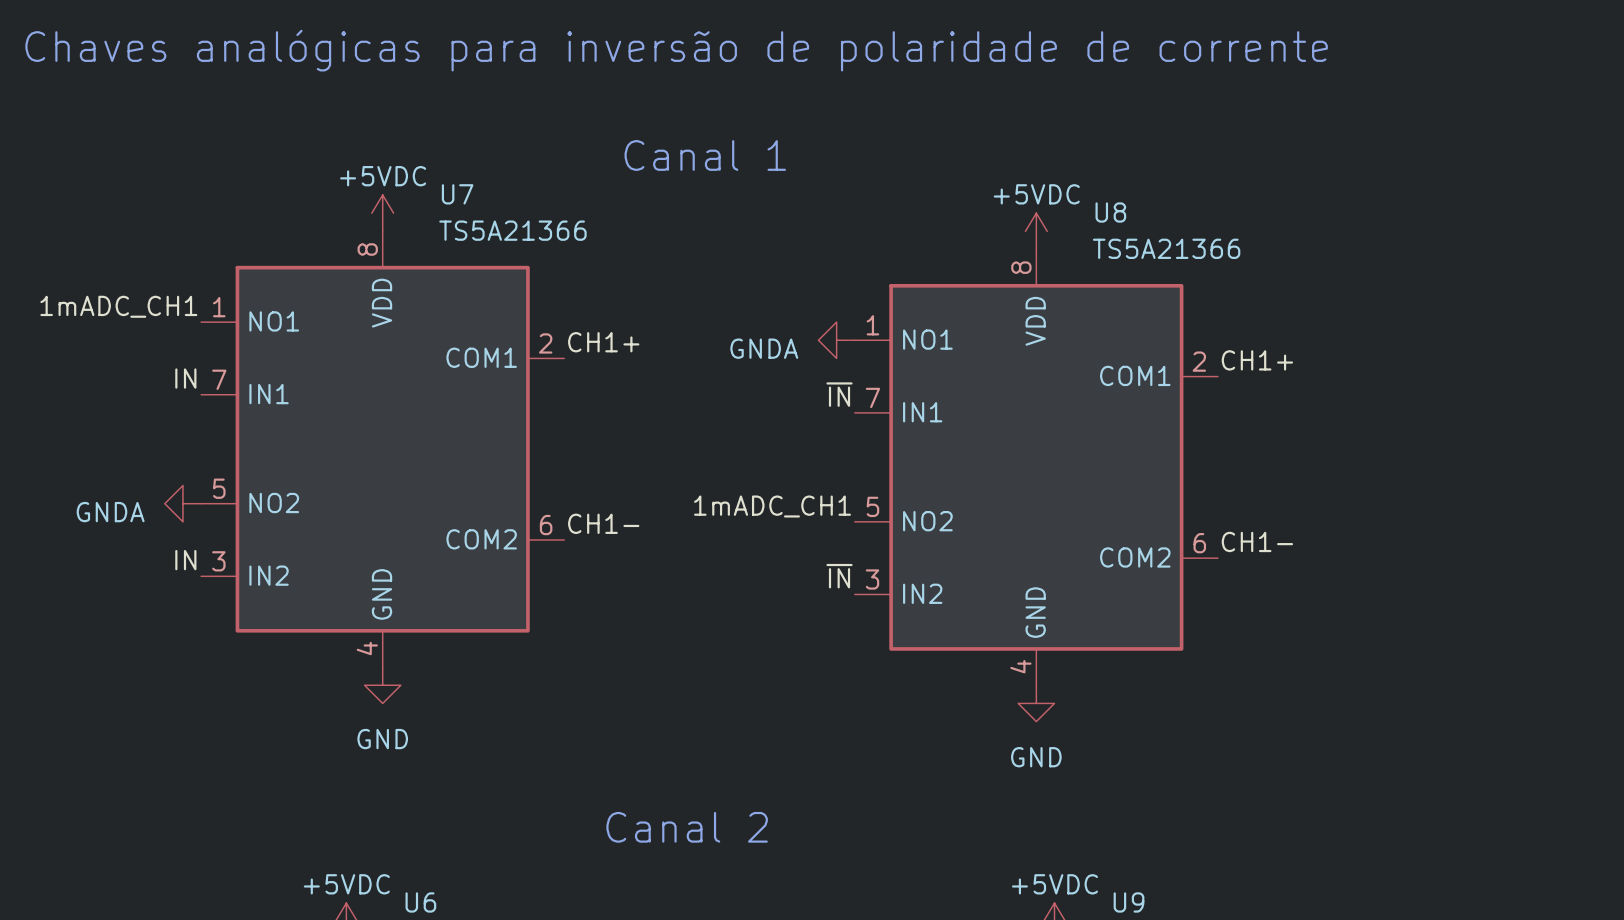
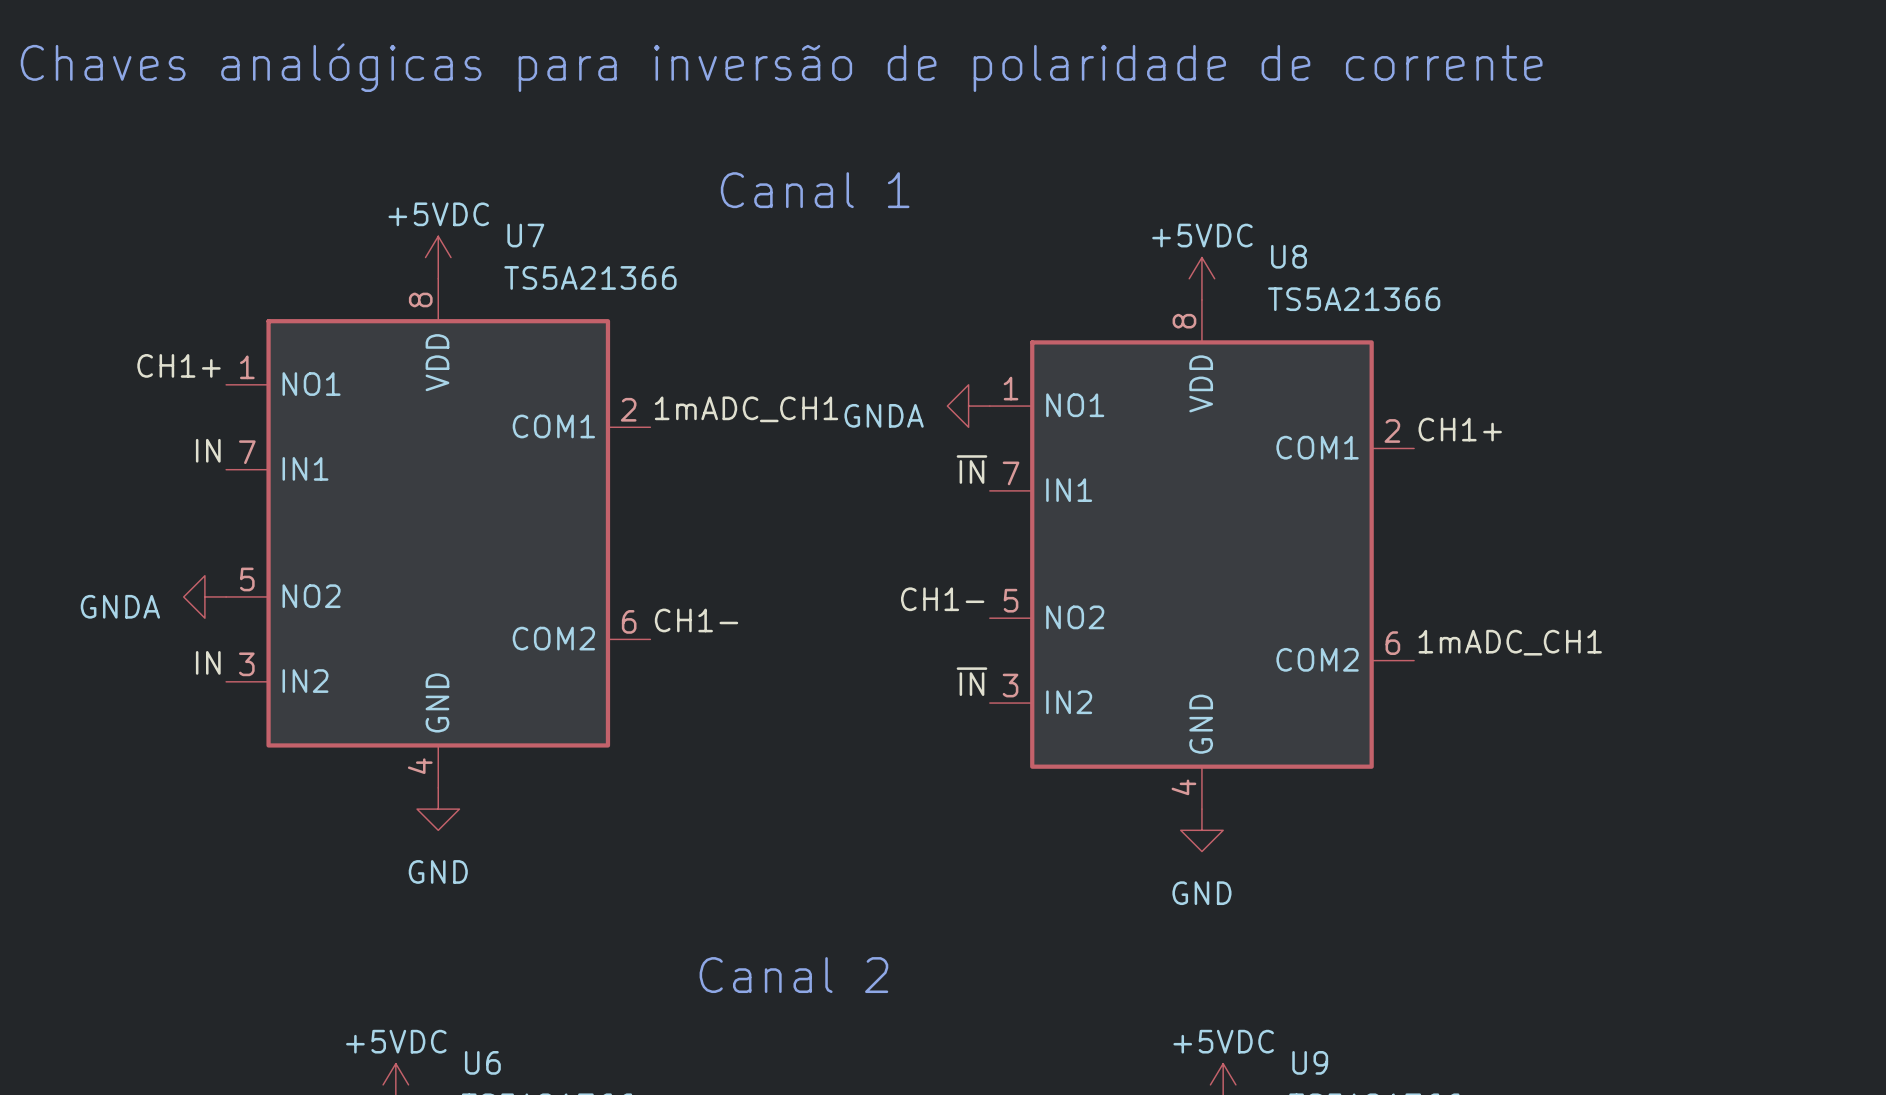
label: 1mADC_CH1 (118, 306) -> CH1+ (178, 365)
label: CH1+ (603, 342) -> 1mADC_CH1 (746, 409)
label: 1mADC_CH1 (772, 506) -> CH1- (942, 599)
label: CH1- (1257, 541) -> 1mADC_CH1 (1510, 642)

